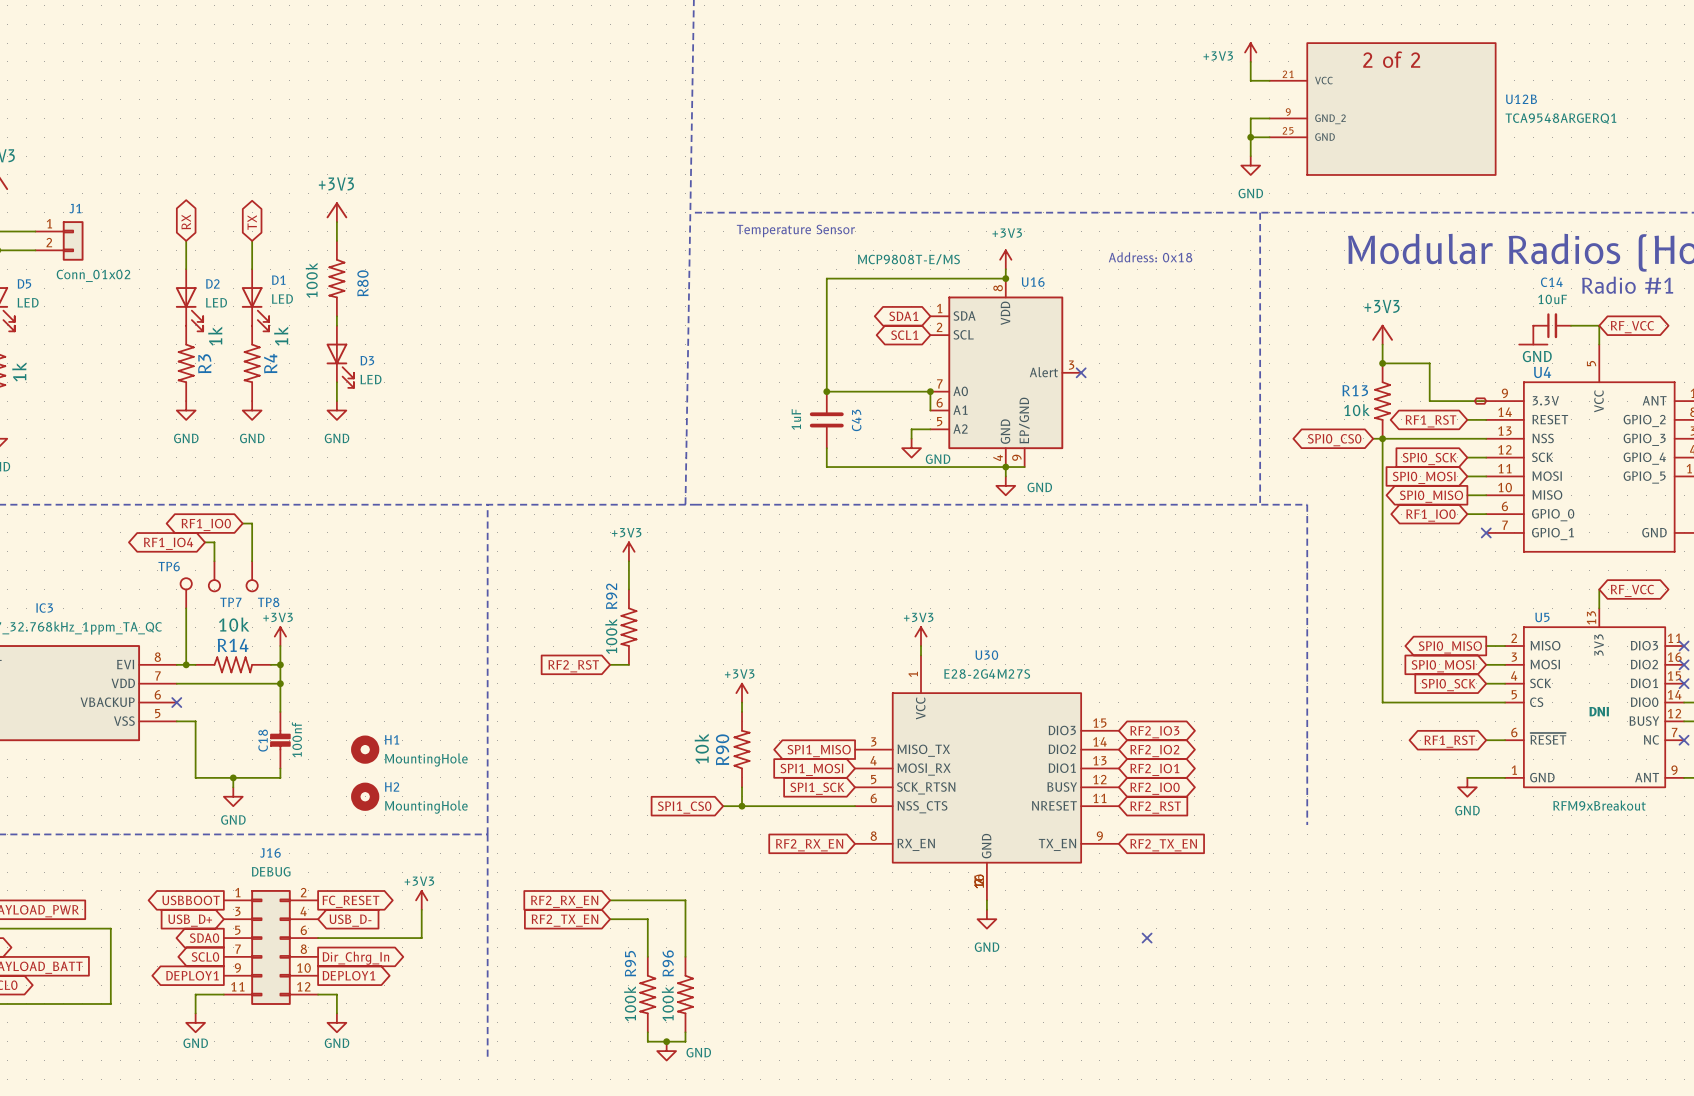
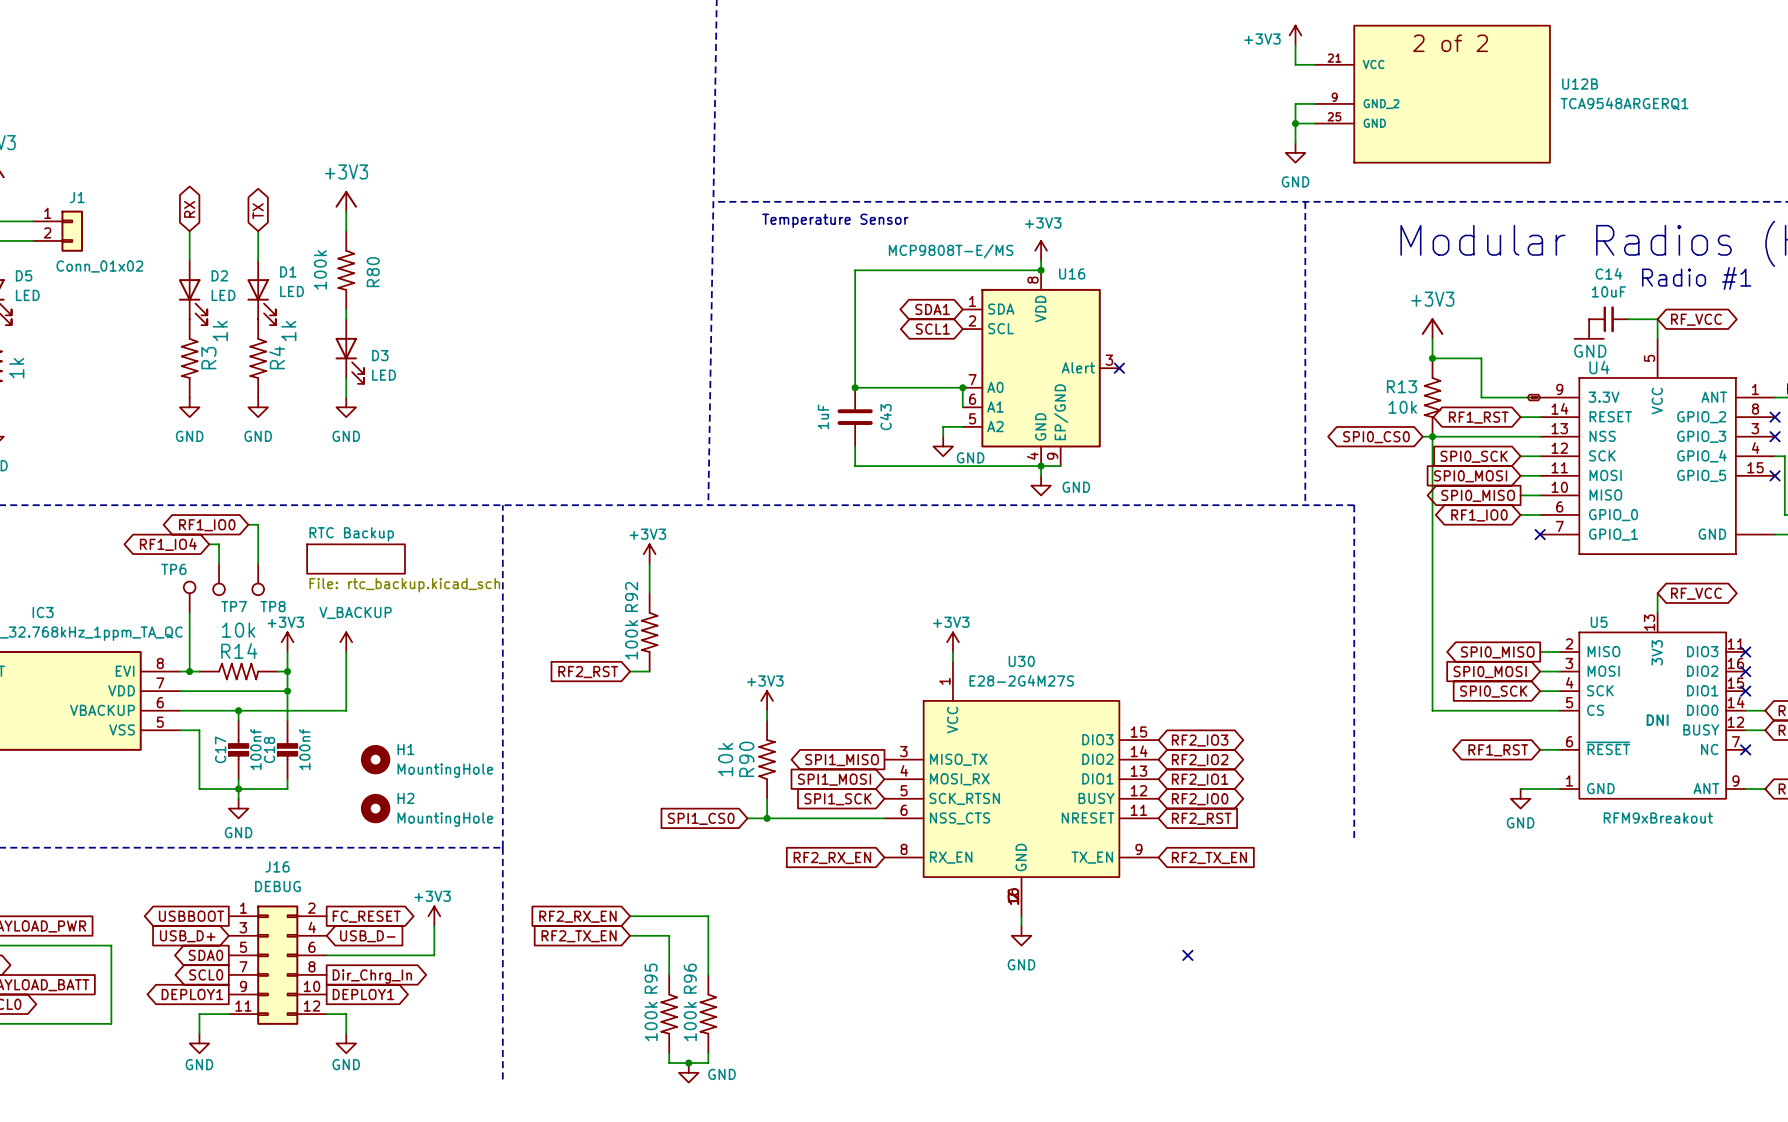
text: Address: 0x18 (1150, 257) -> none
sheet RTC Backup: none -> File: rtc_backup.kicad_sch (356, 559)
power symbol: none -> V_BACKUP (346, 642)
wire: none -> (346, 651) (346, 710) (179, 710)
no-connect mark: (176, 702) -> none
wire: none -> (238, 710) (238, 720)
junction: none -> (238, 710)
C17: none -> 100nf (238, 749)
wire: none -> (238, 779) (238, 789)

